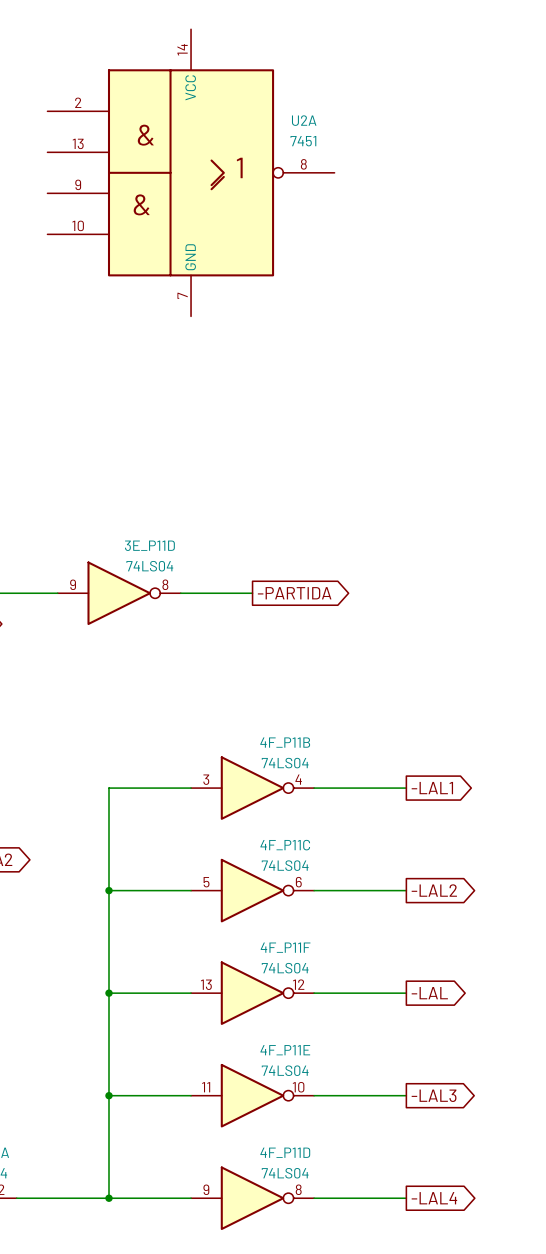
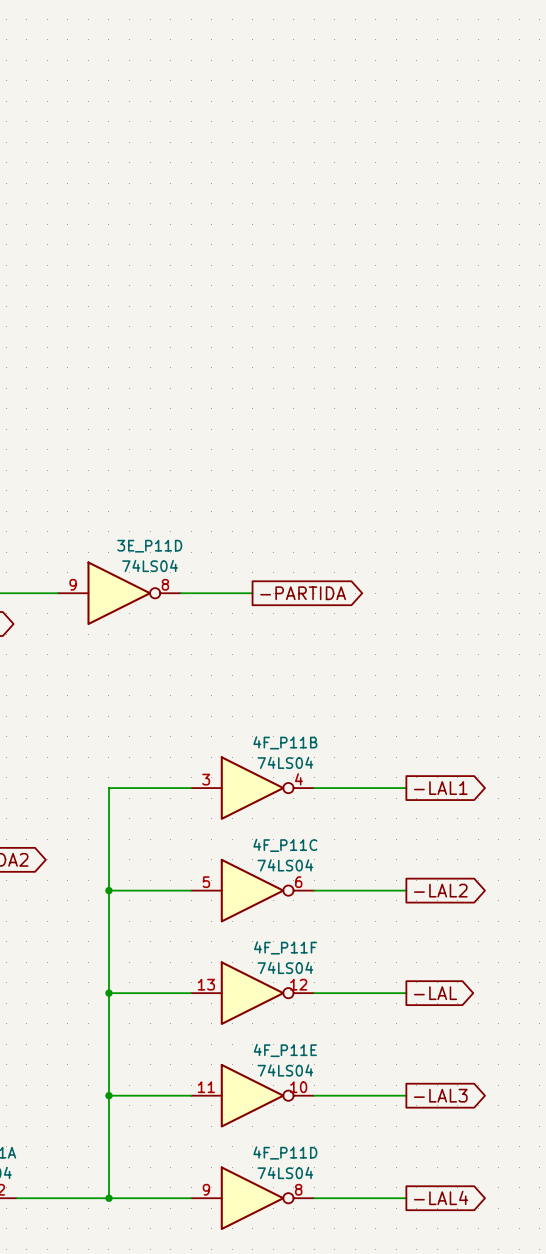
U2A: 7451 (191, 172) -> none

